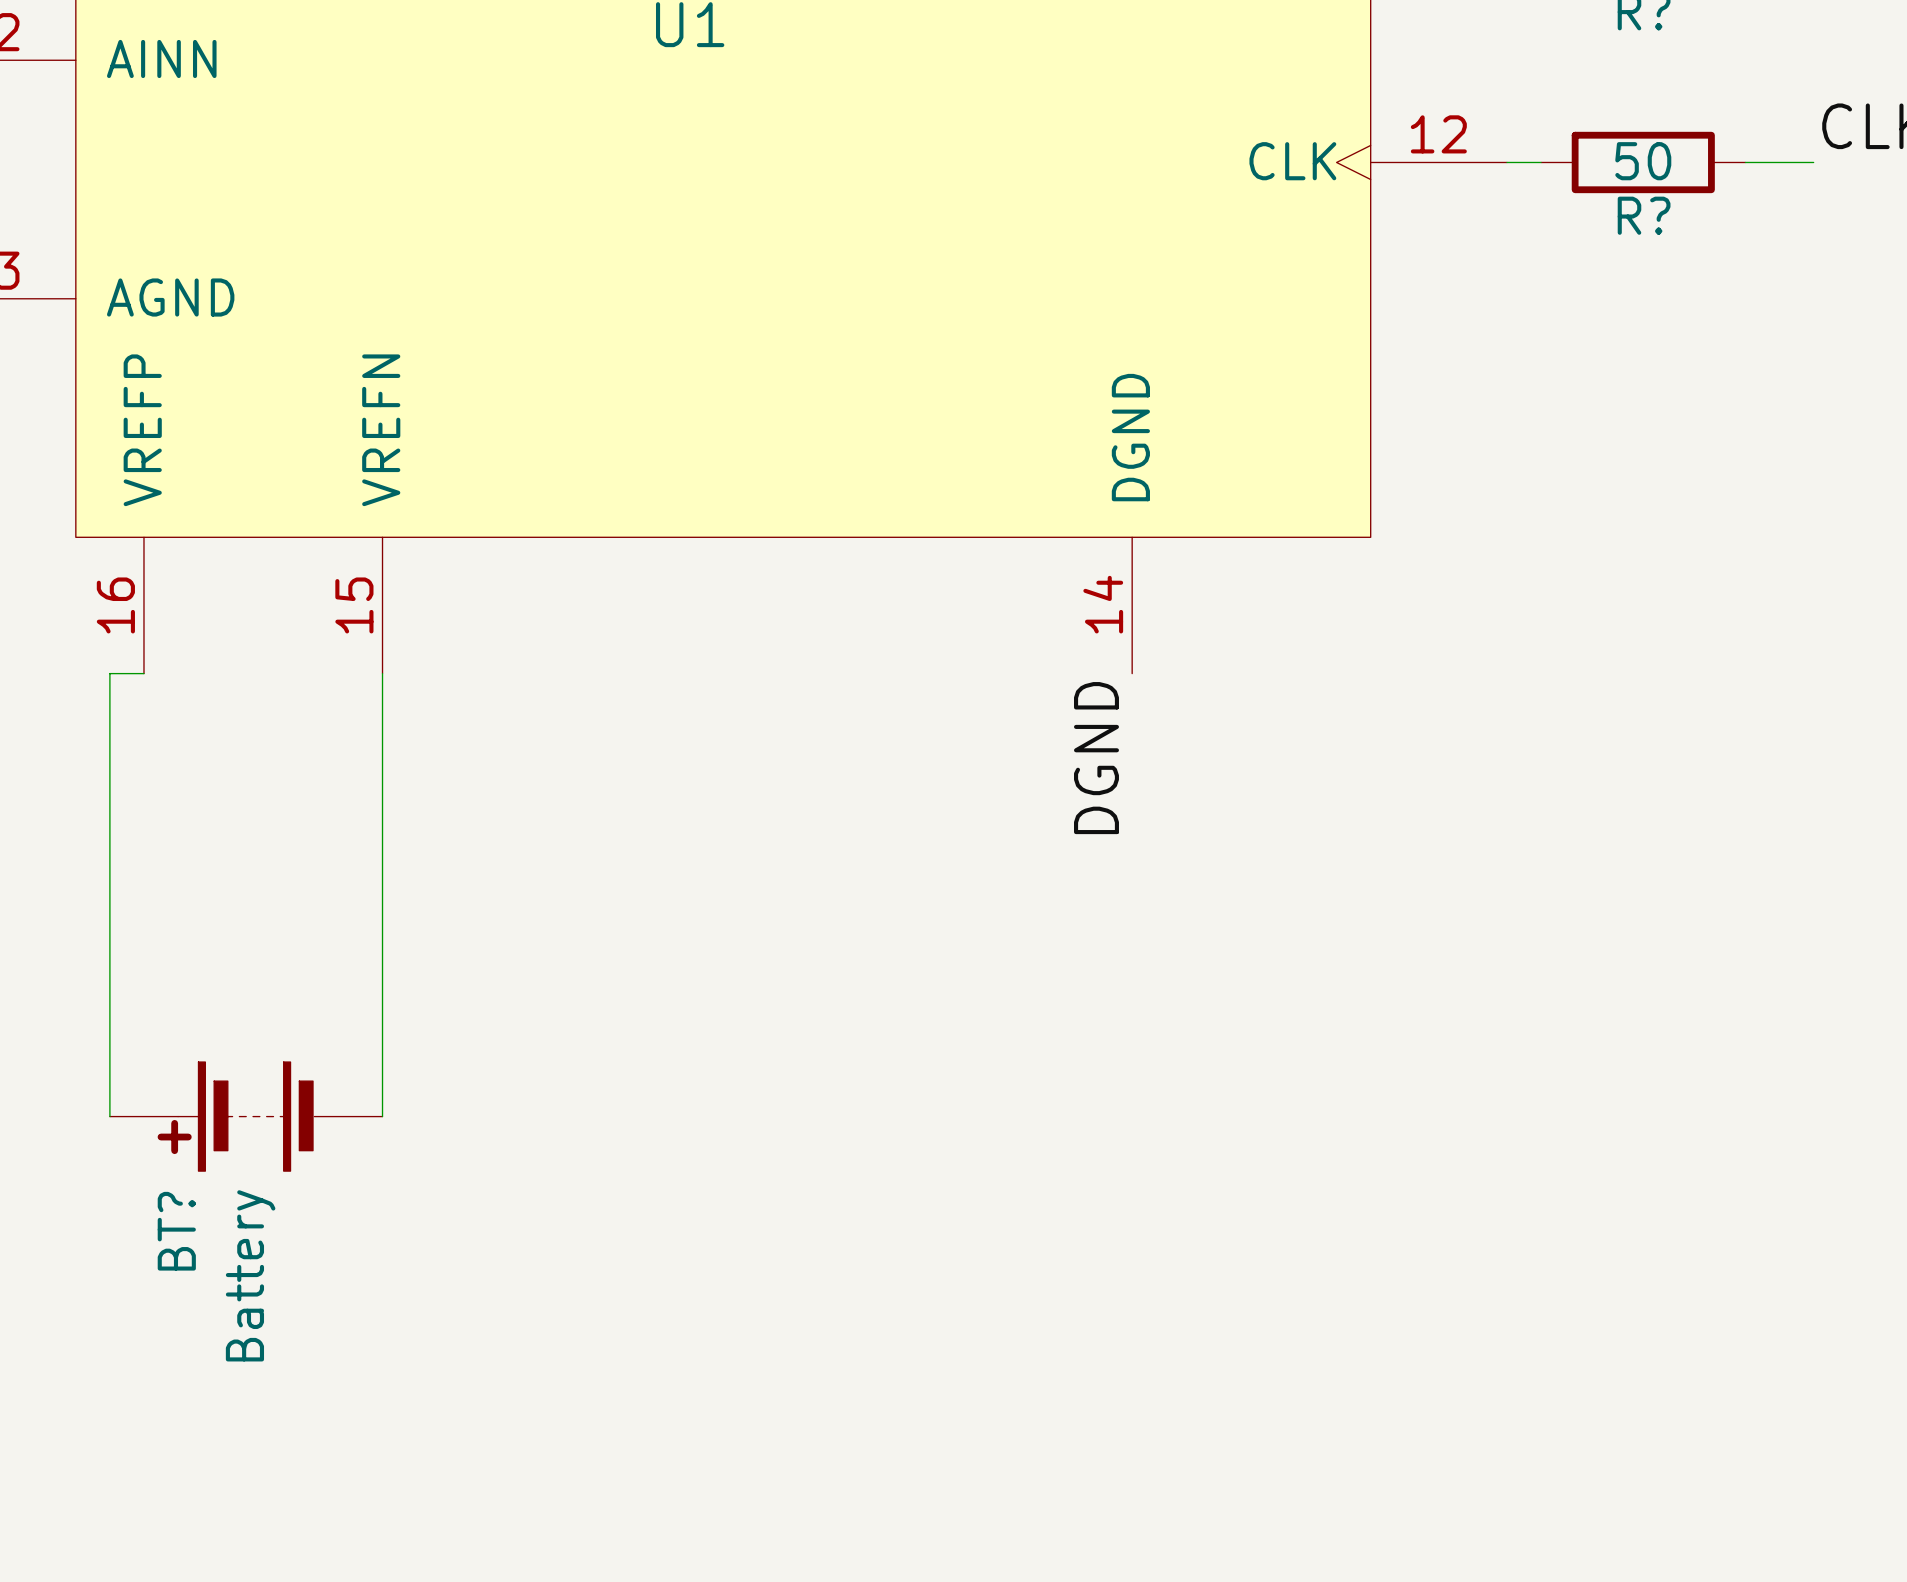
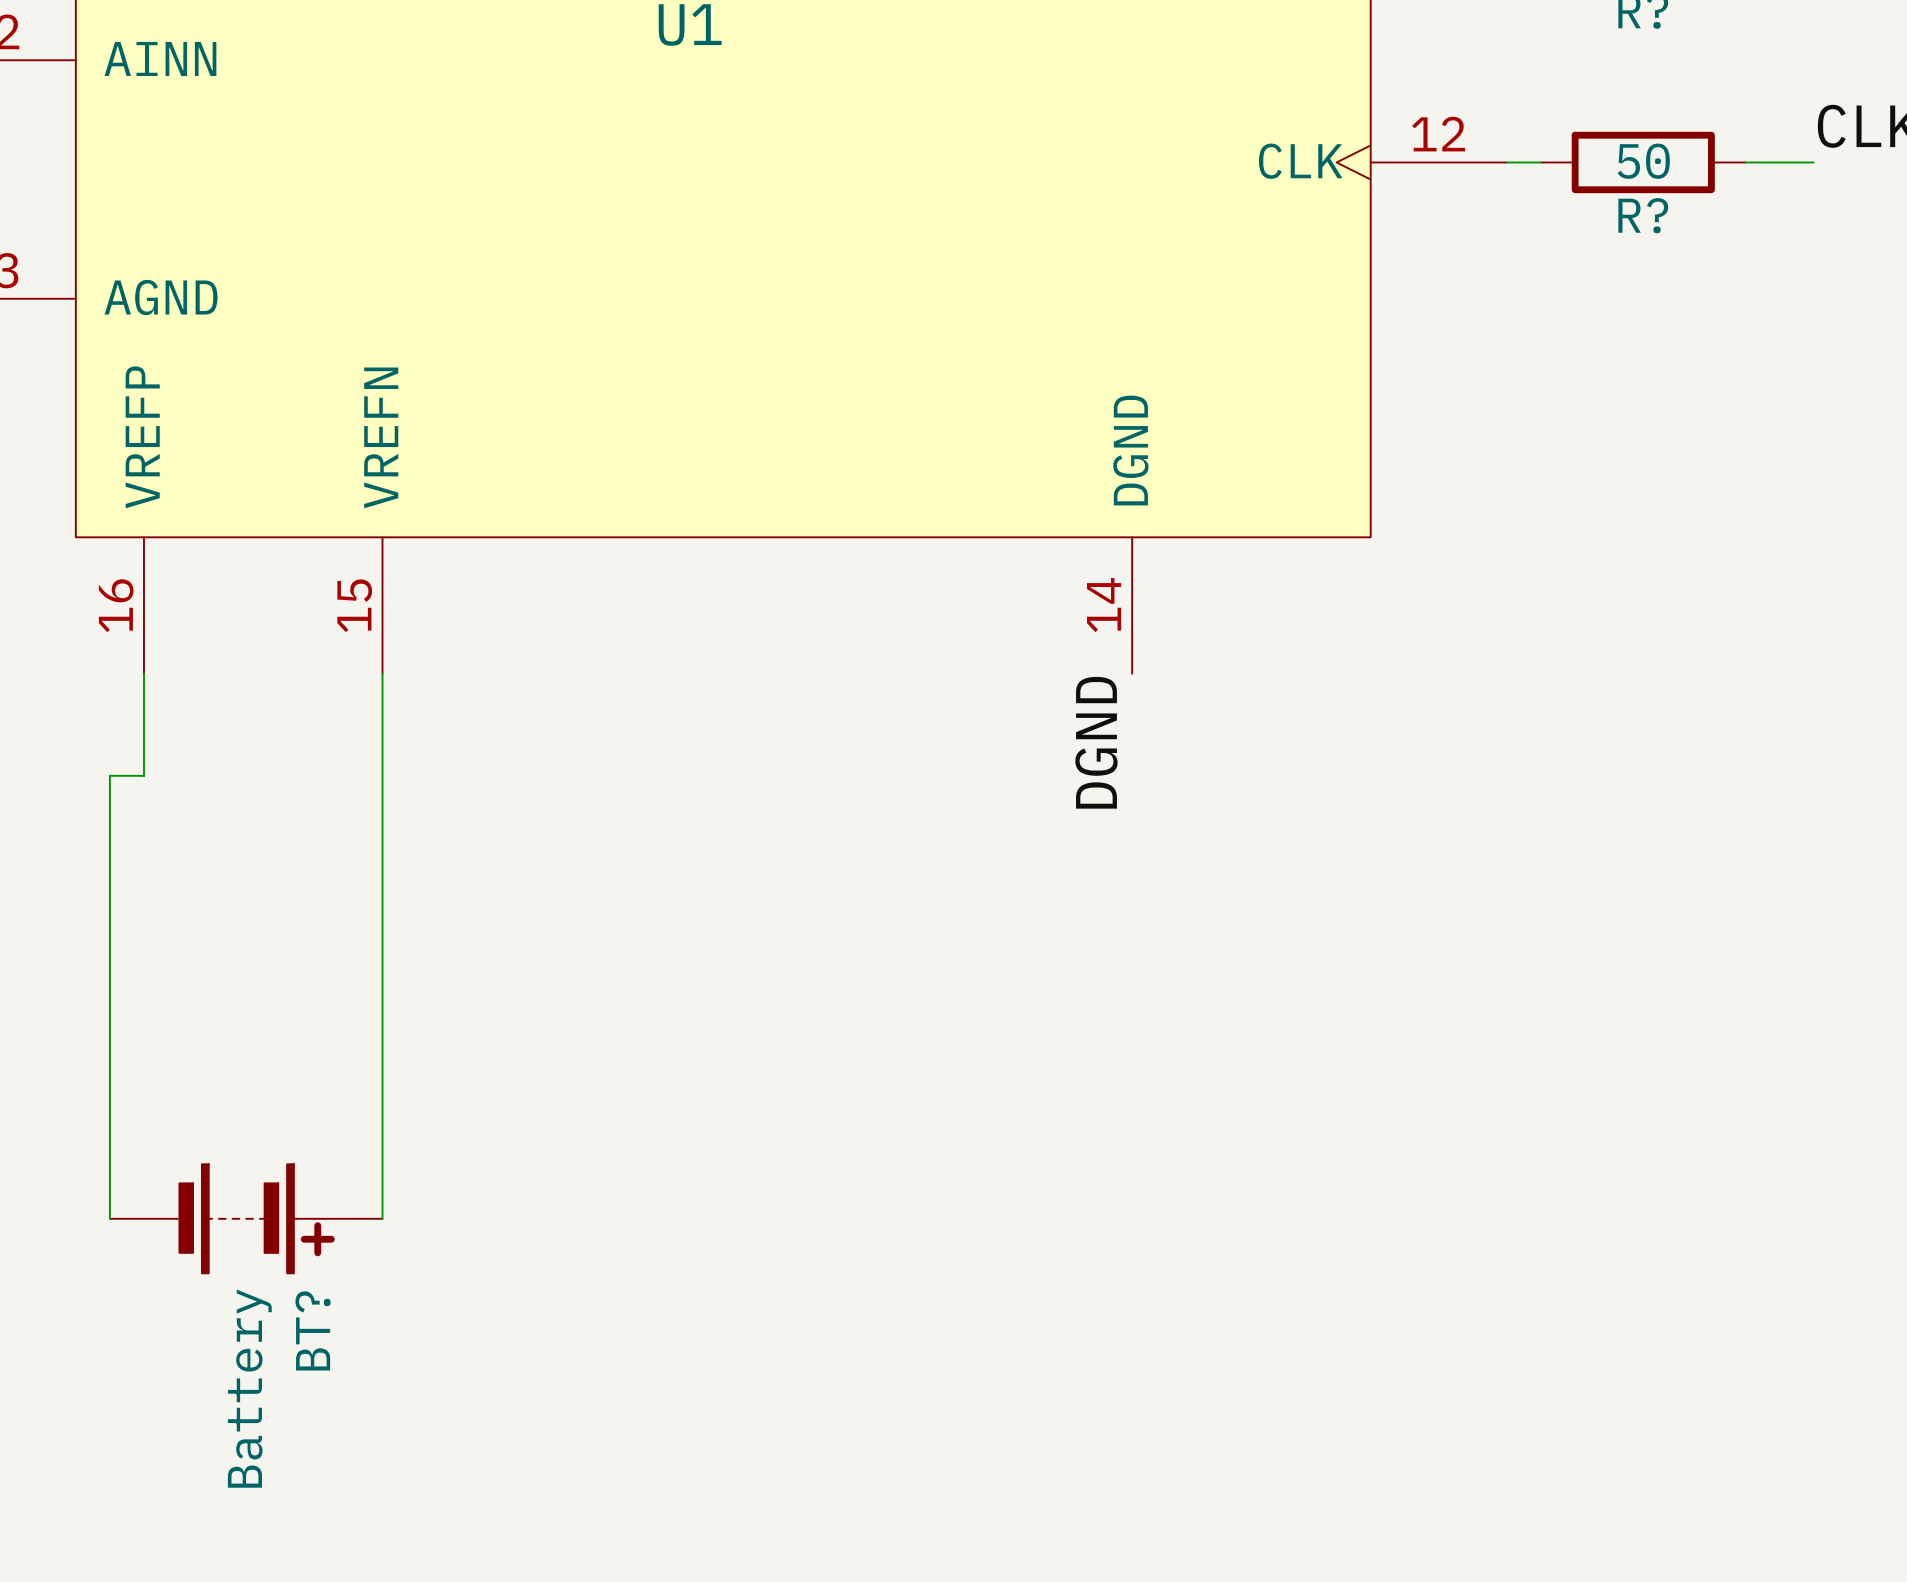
wire: (143, 673) (109, 673) (109, 775) -> (143, 673) (143, 775) (109, 775)
wire: none -> (109, 1116) (109, 1218)
BT?: Battery (246, 1116) -> none
wire: none -> (382, 1116) (382, 1218)
BT?: none -> Battery (246, 1218)

